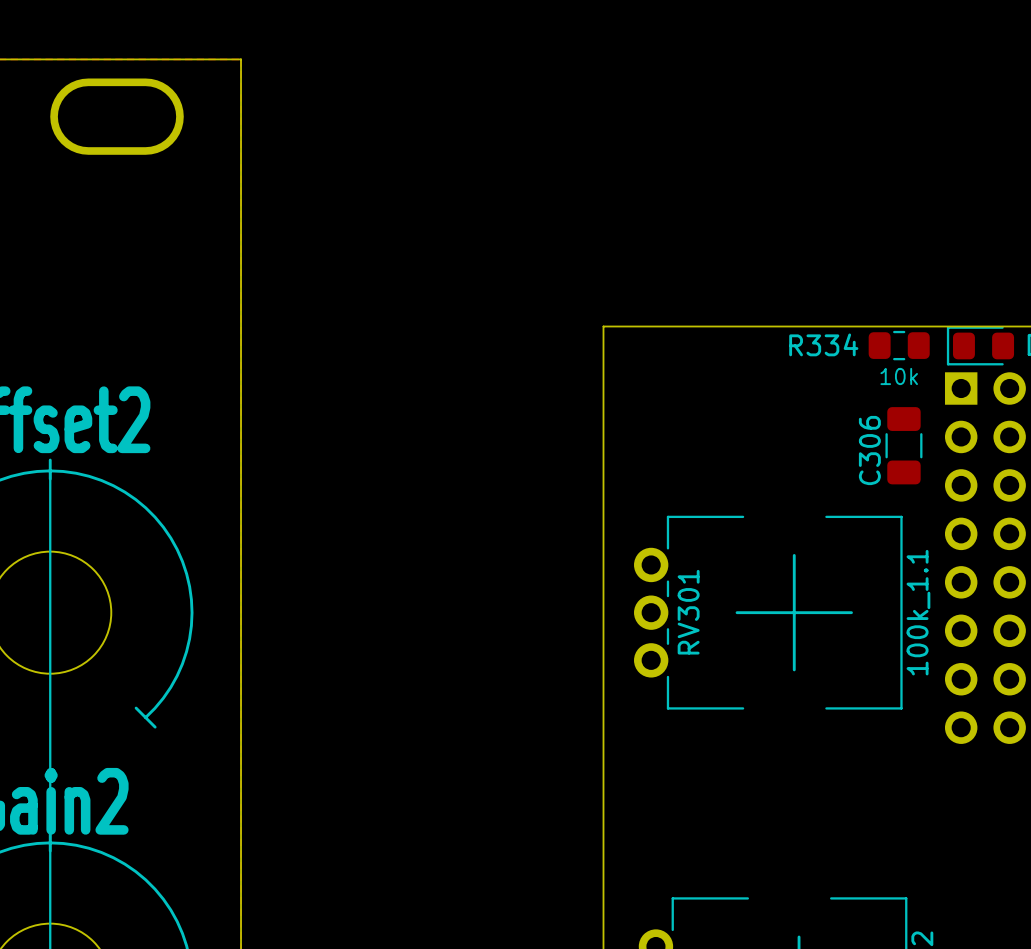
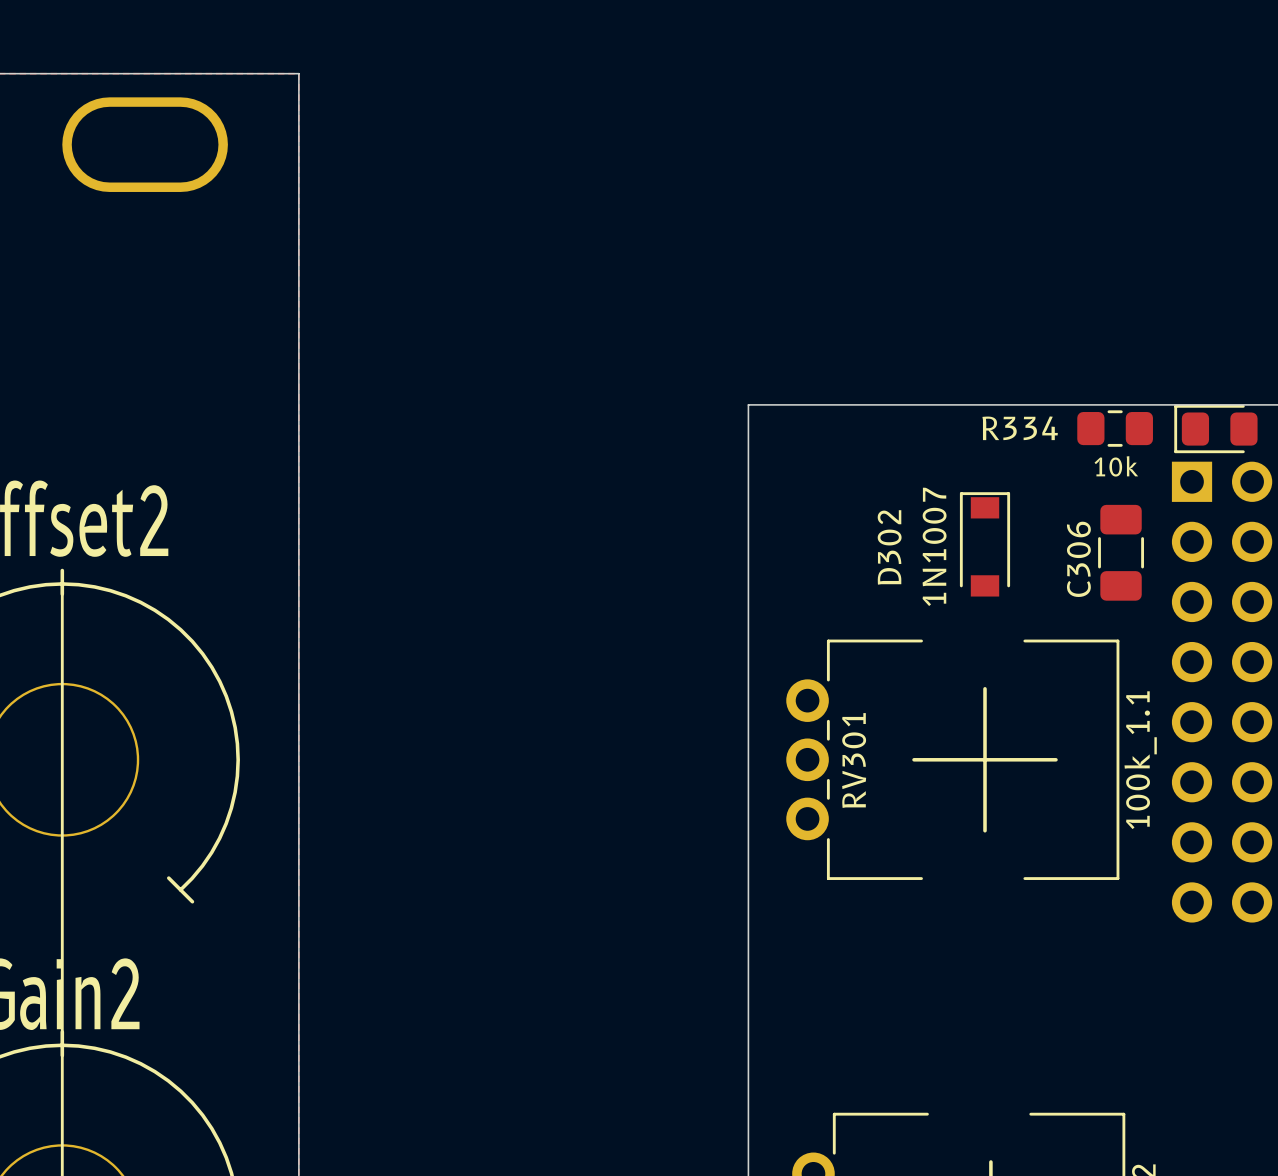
D302: none -> 1N1007 (985, 544)

